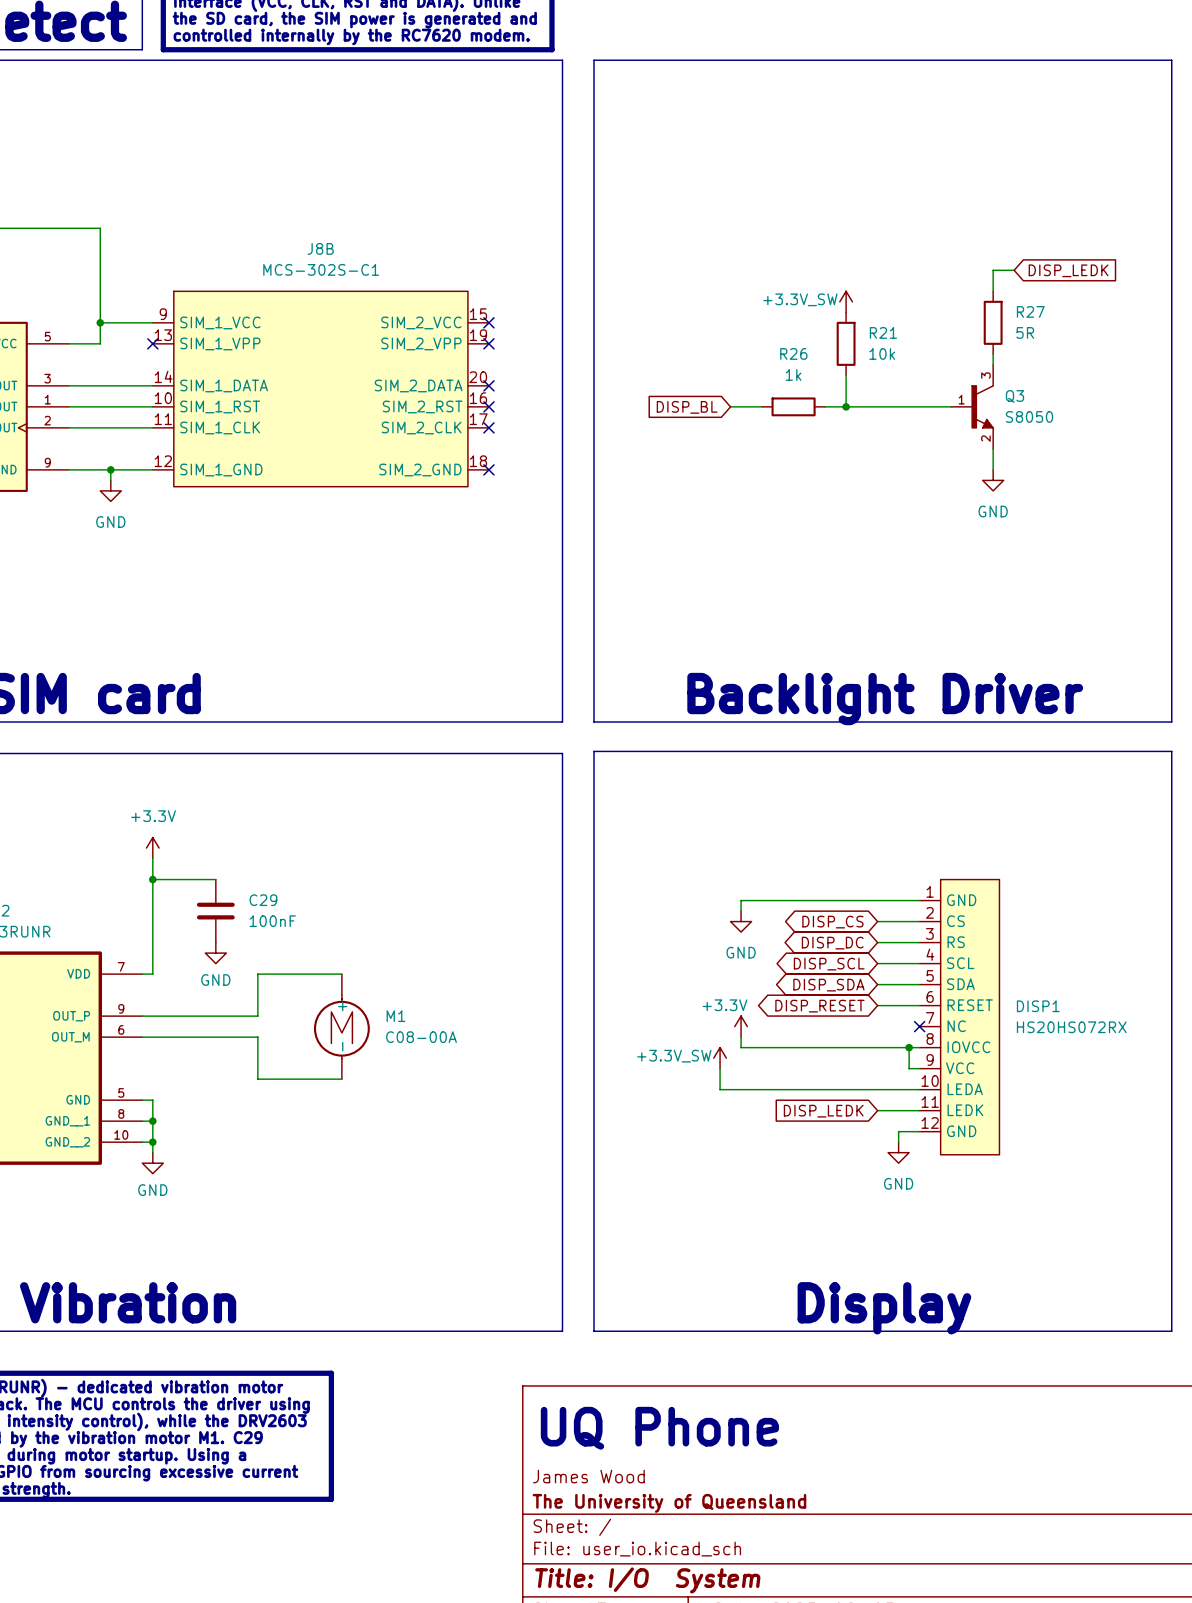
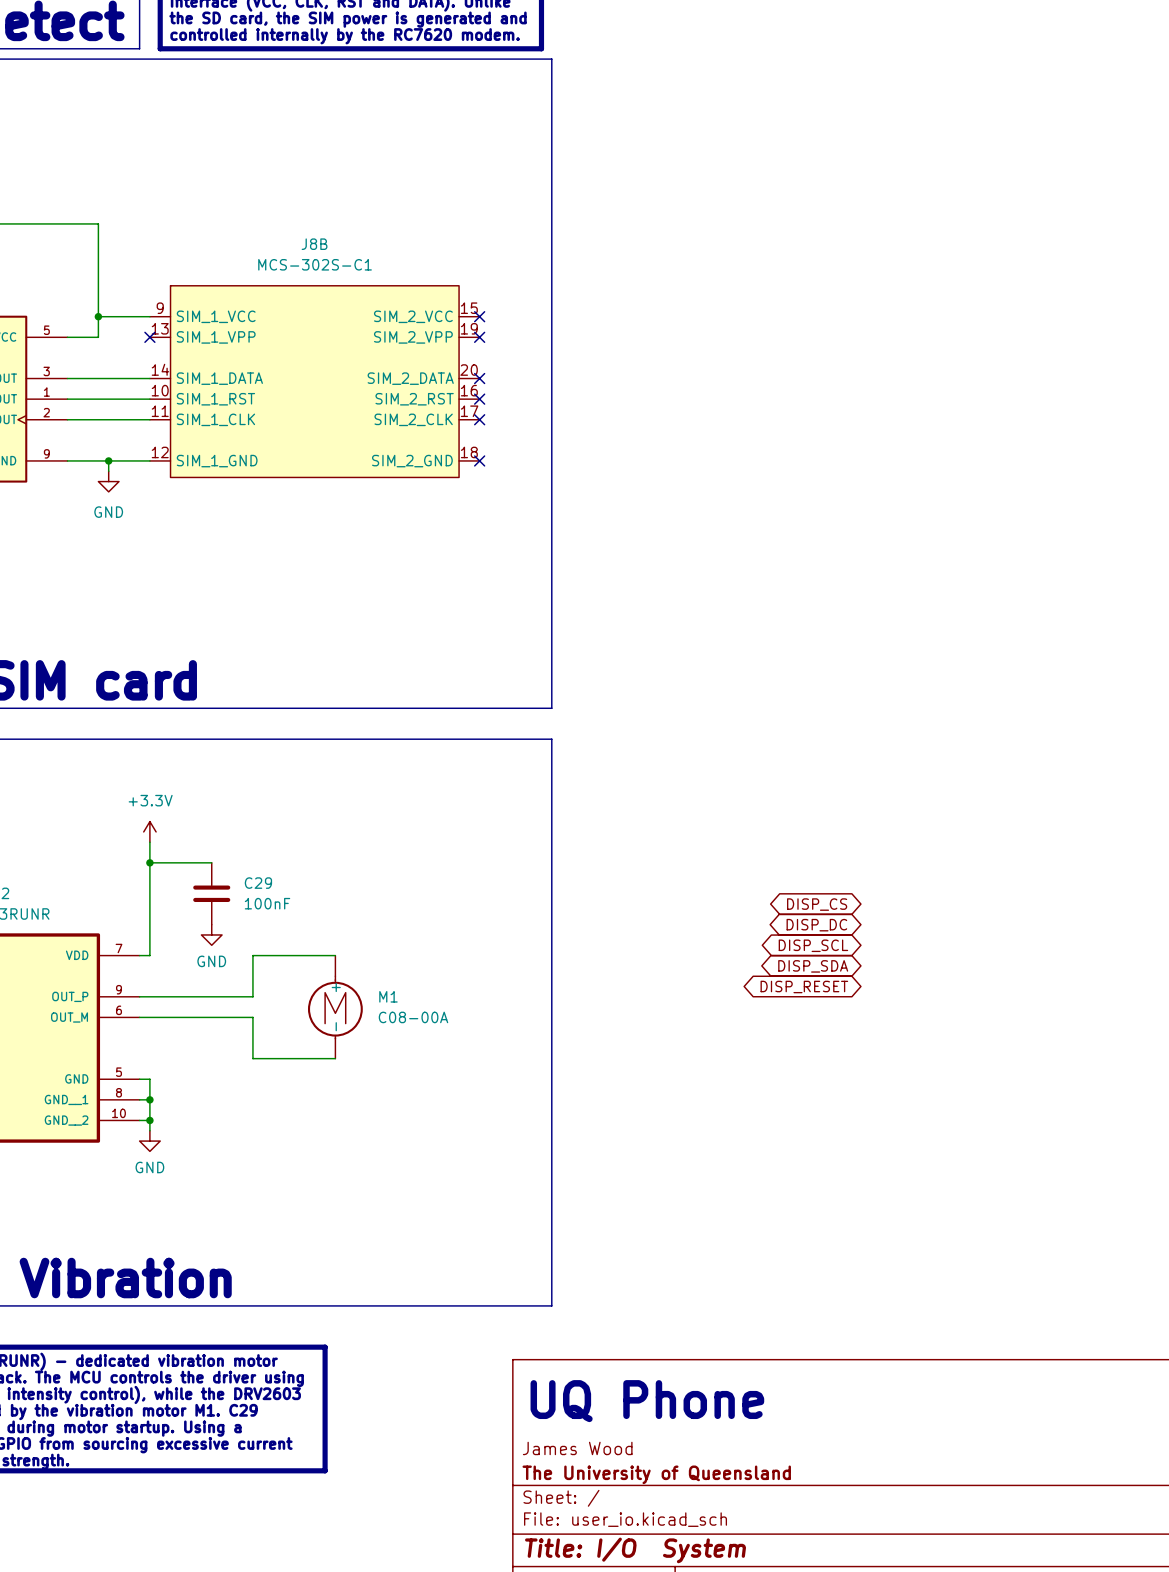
line: (593, 60) (593, 722) (1171, 722) (1171, 60) (593, 60) -> none
wire: (1014, 270) (993, 270) (993, 291) -> none
global label: DISP_LEDK (1068, 270) -> none
power symbol: +3.3V_SW (846, 301) -> none
R27: 5R (993, 322) -> none
R21: 10k (846, 343) -> none
wire: (993, 354) (993, 364) -> none
wire: (846, 375) (846, 406) -> none
wire: (730, 406) (762, 406) -> none
R26: 1k (793, 406) -> none
wire: (825, 406) (951, 406) -> none
junction: (846, 406) -> none
Q3: S8050 (972, 406) -> none
global label: DISP_BL (687, 407) -> none
wire: (993, 448) (993, 469) -> none
power symbol: GND (993, 480) -> none
text: Backlight Driver (885, 699) -> none
line: (593, 751) (1171, 751) (1171, 1331) (593, 1331) (593, 751) -> none
wire: (919, 900) (741, 900) (741, 911) -> none
power symbol: GND (741, 921) -> none
wire: (877, 921) (919, 921) -> none
wire: (877, 942) (919, 942) -> none
wire: (877, 963) (919, 963) -> none
wire: (877, 984) (919, 984) -> none
wire: (877, 1005) (919, 1005) -> none
DISP1: HS20HS072RX (959, 1017) -> none
power symbol: +3.3V (741, 1026) -> none
no-connect mark: (919, 1026) -> none
wire: (741, 1037) (741, 1047) (919, 1047) -> none
wire: (909, 1047) (909, 1068) (919, 1068) -> none
junction: (909, 1047) -> none
power symbol: +3.3V_SW (720, 1058) -> none
wire: (720, 1068) (720, 1089) (919, 1089) -> none
wire: (877, 1110) (919, 1110) -> none
global label: DISP_LEDK (823, 1111) -> none
wire: (919, 1131) (898, 1131) (898, 1142) -> none
power symbol: GND (898, 1152) -> none
text: Display (884, 1308) -> none

